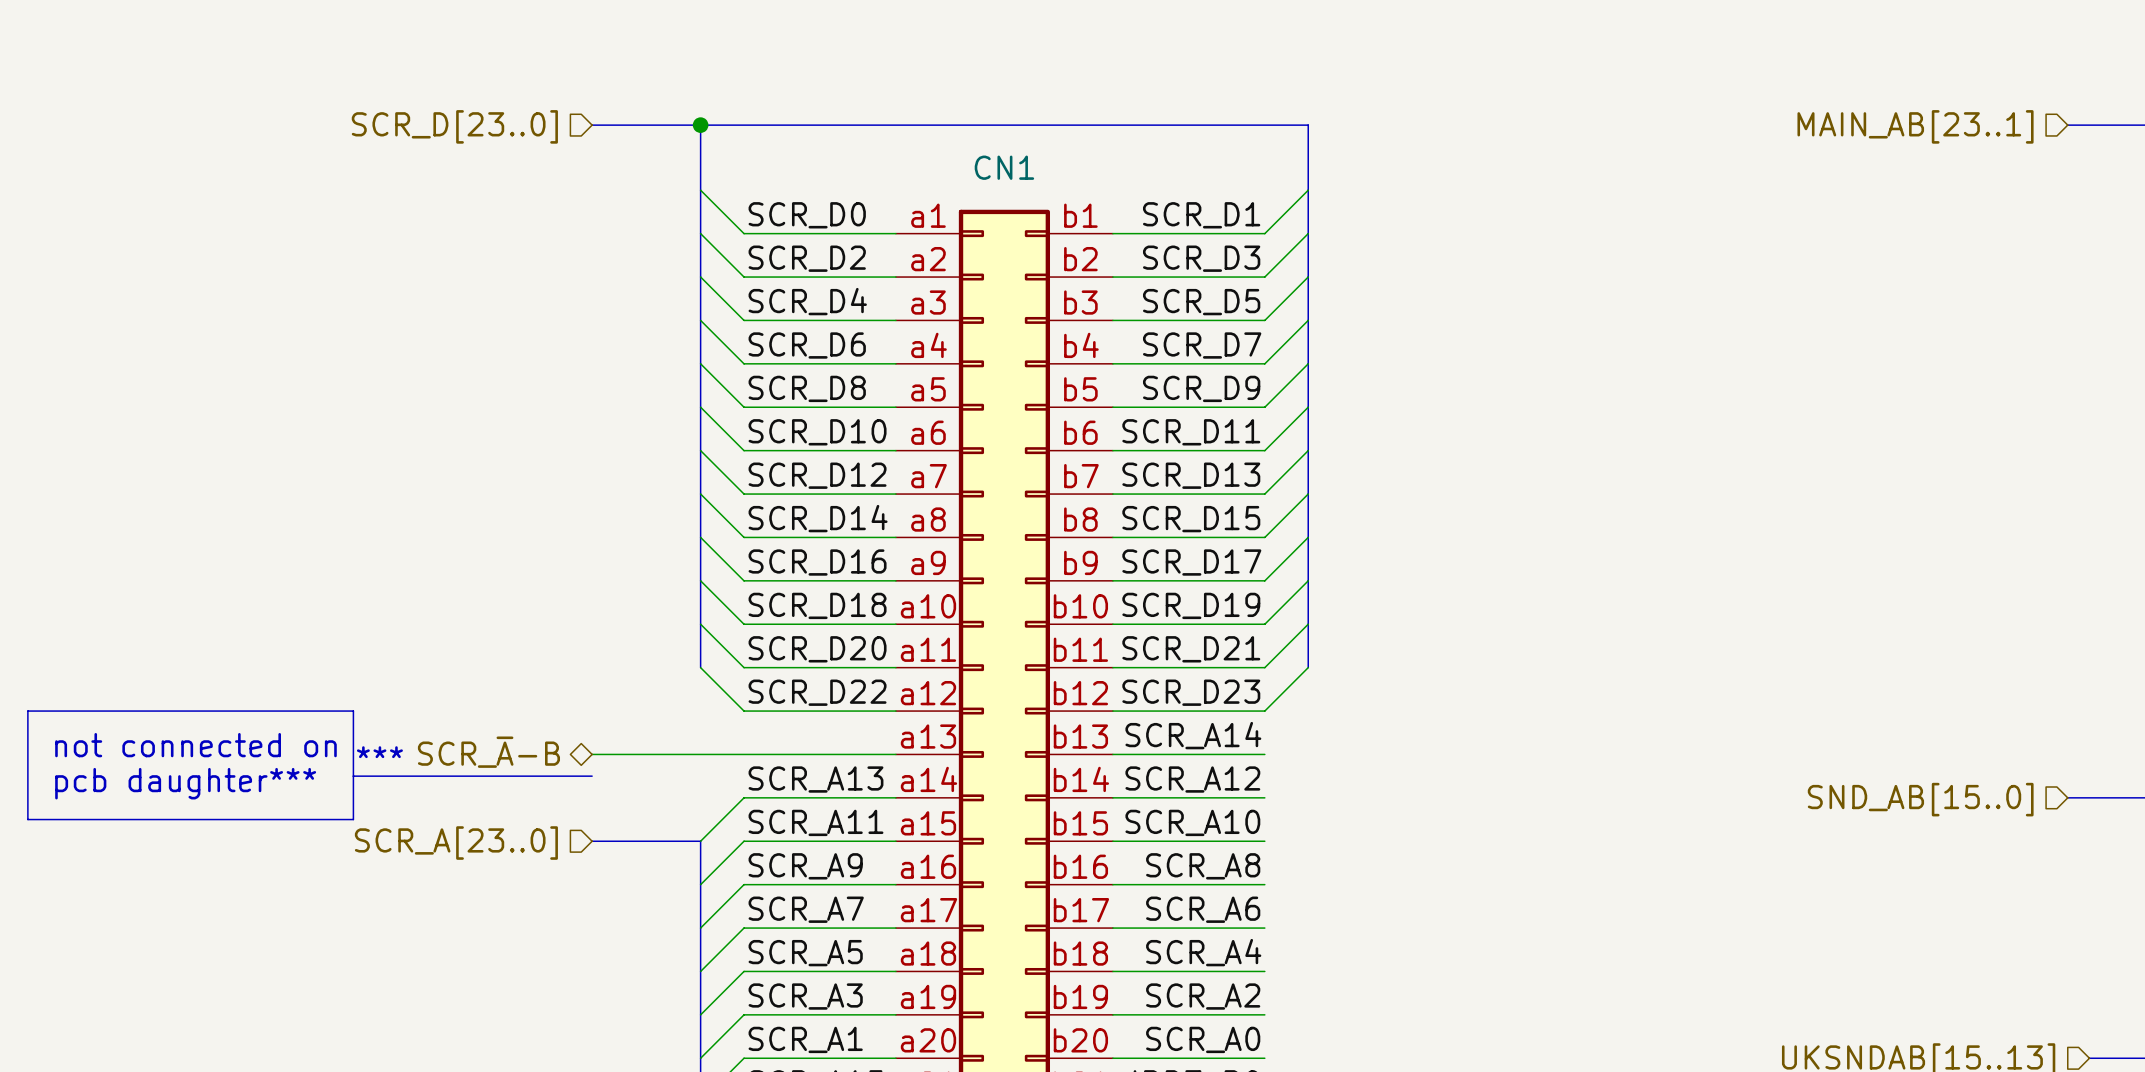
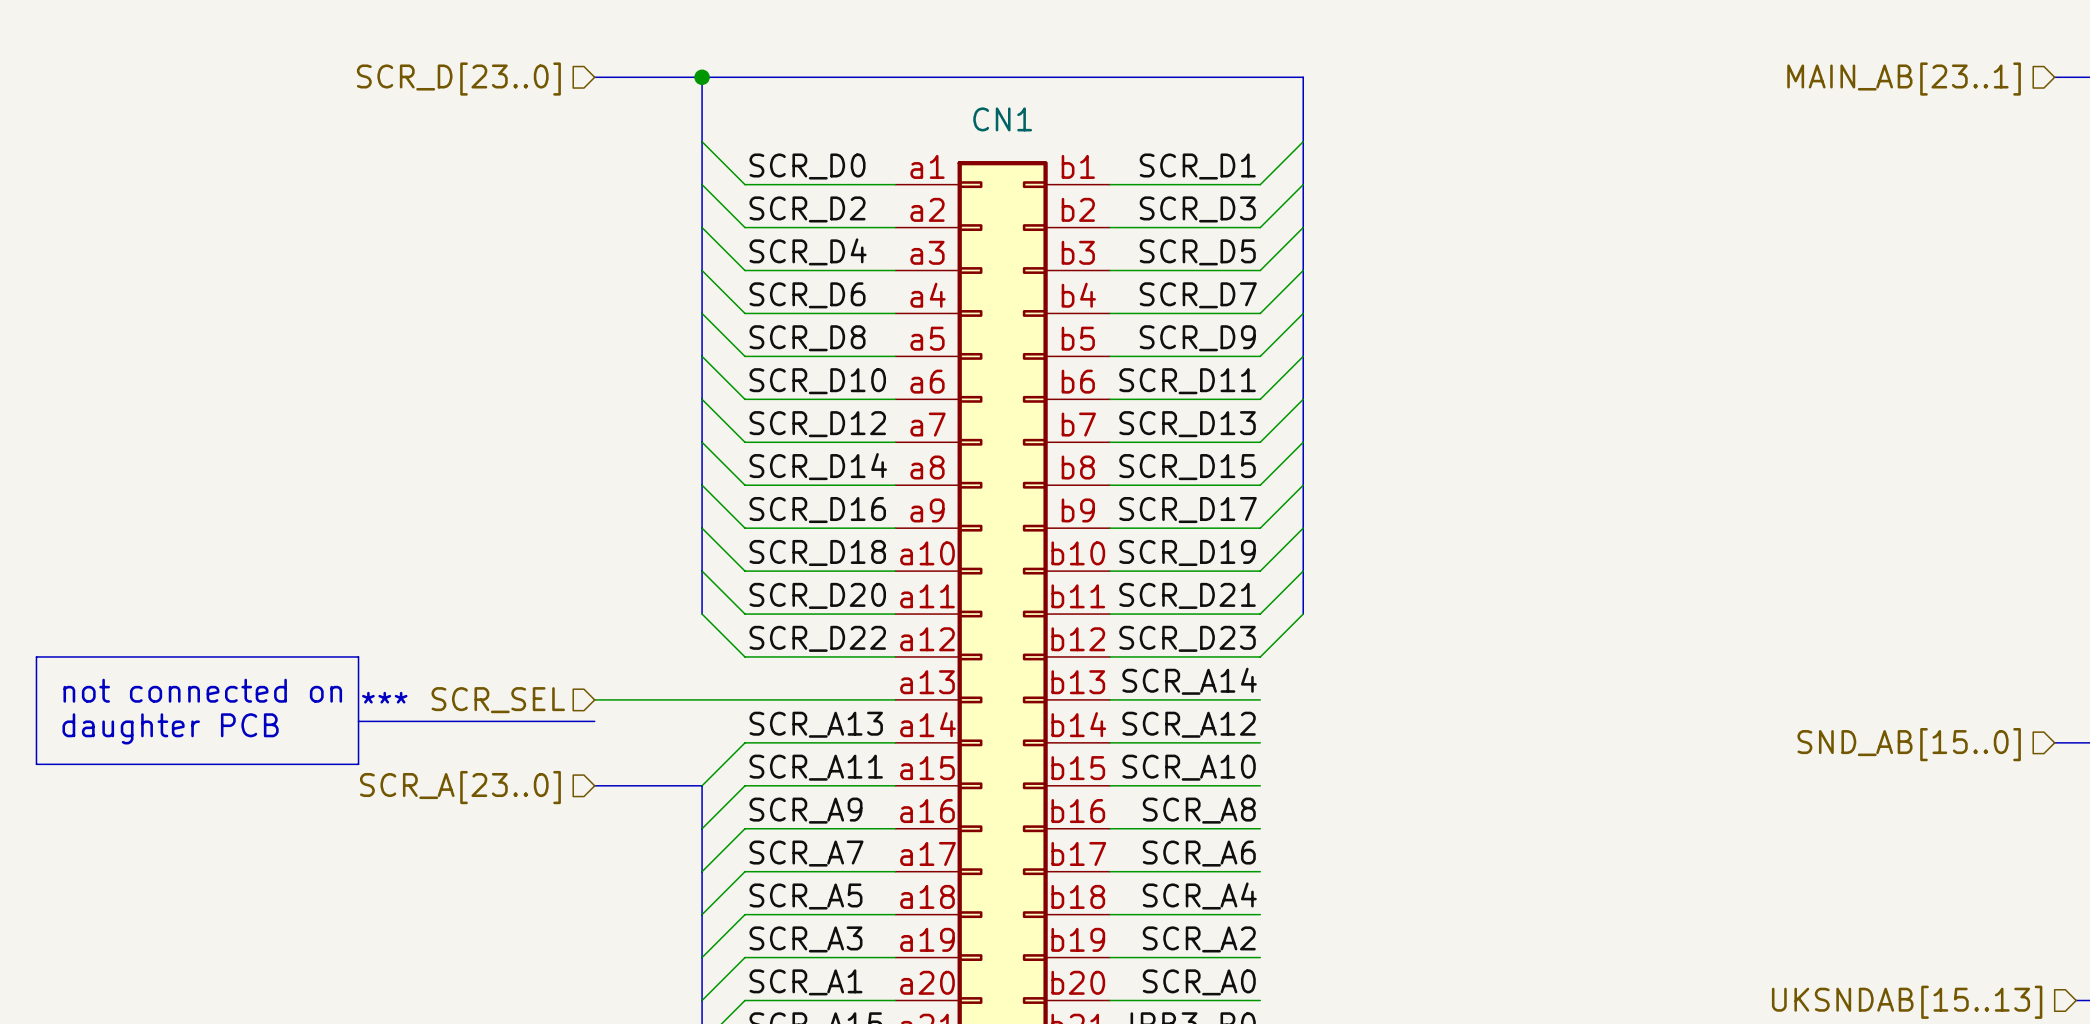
hierarchical label shape: bidirectional (488, 752) -> input (498, 700)
hierarchical label: SCR_~{A}-B (488, 752) -> SCR_SEL (498, 700)
text: *** (293, 773) -> none
text: pcb daughter (161, 783) -> daughter PCB (170, 728)

